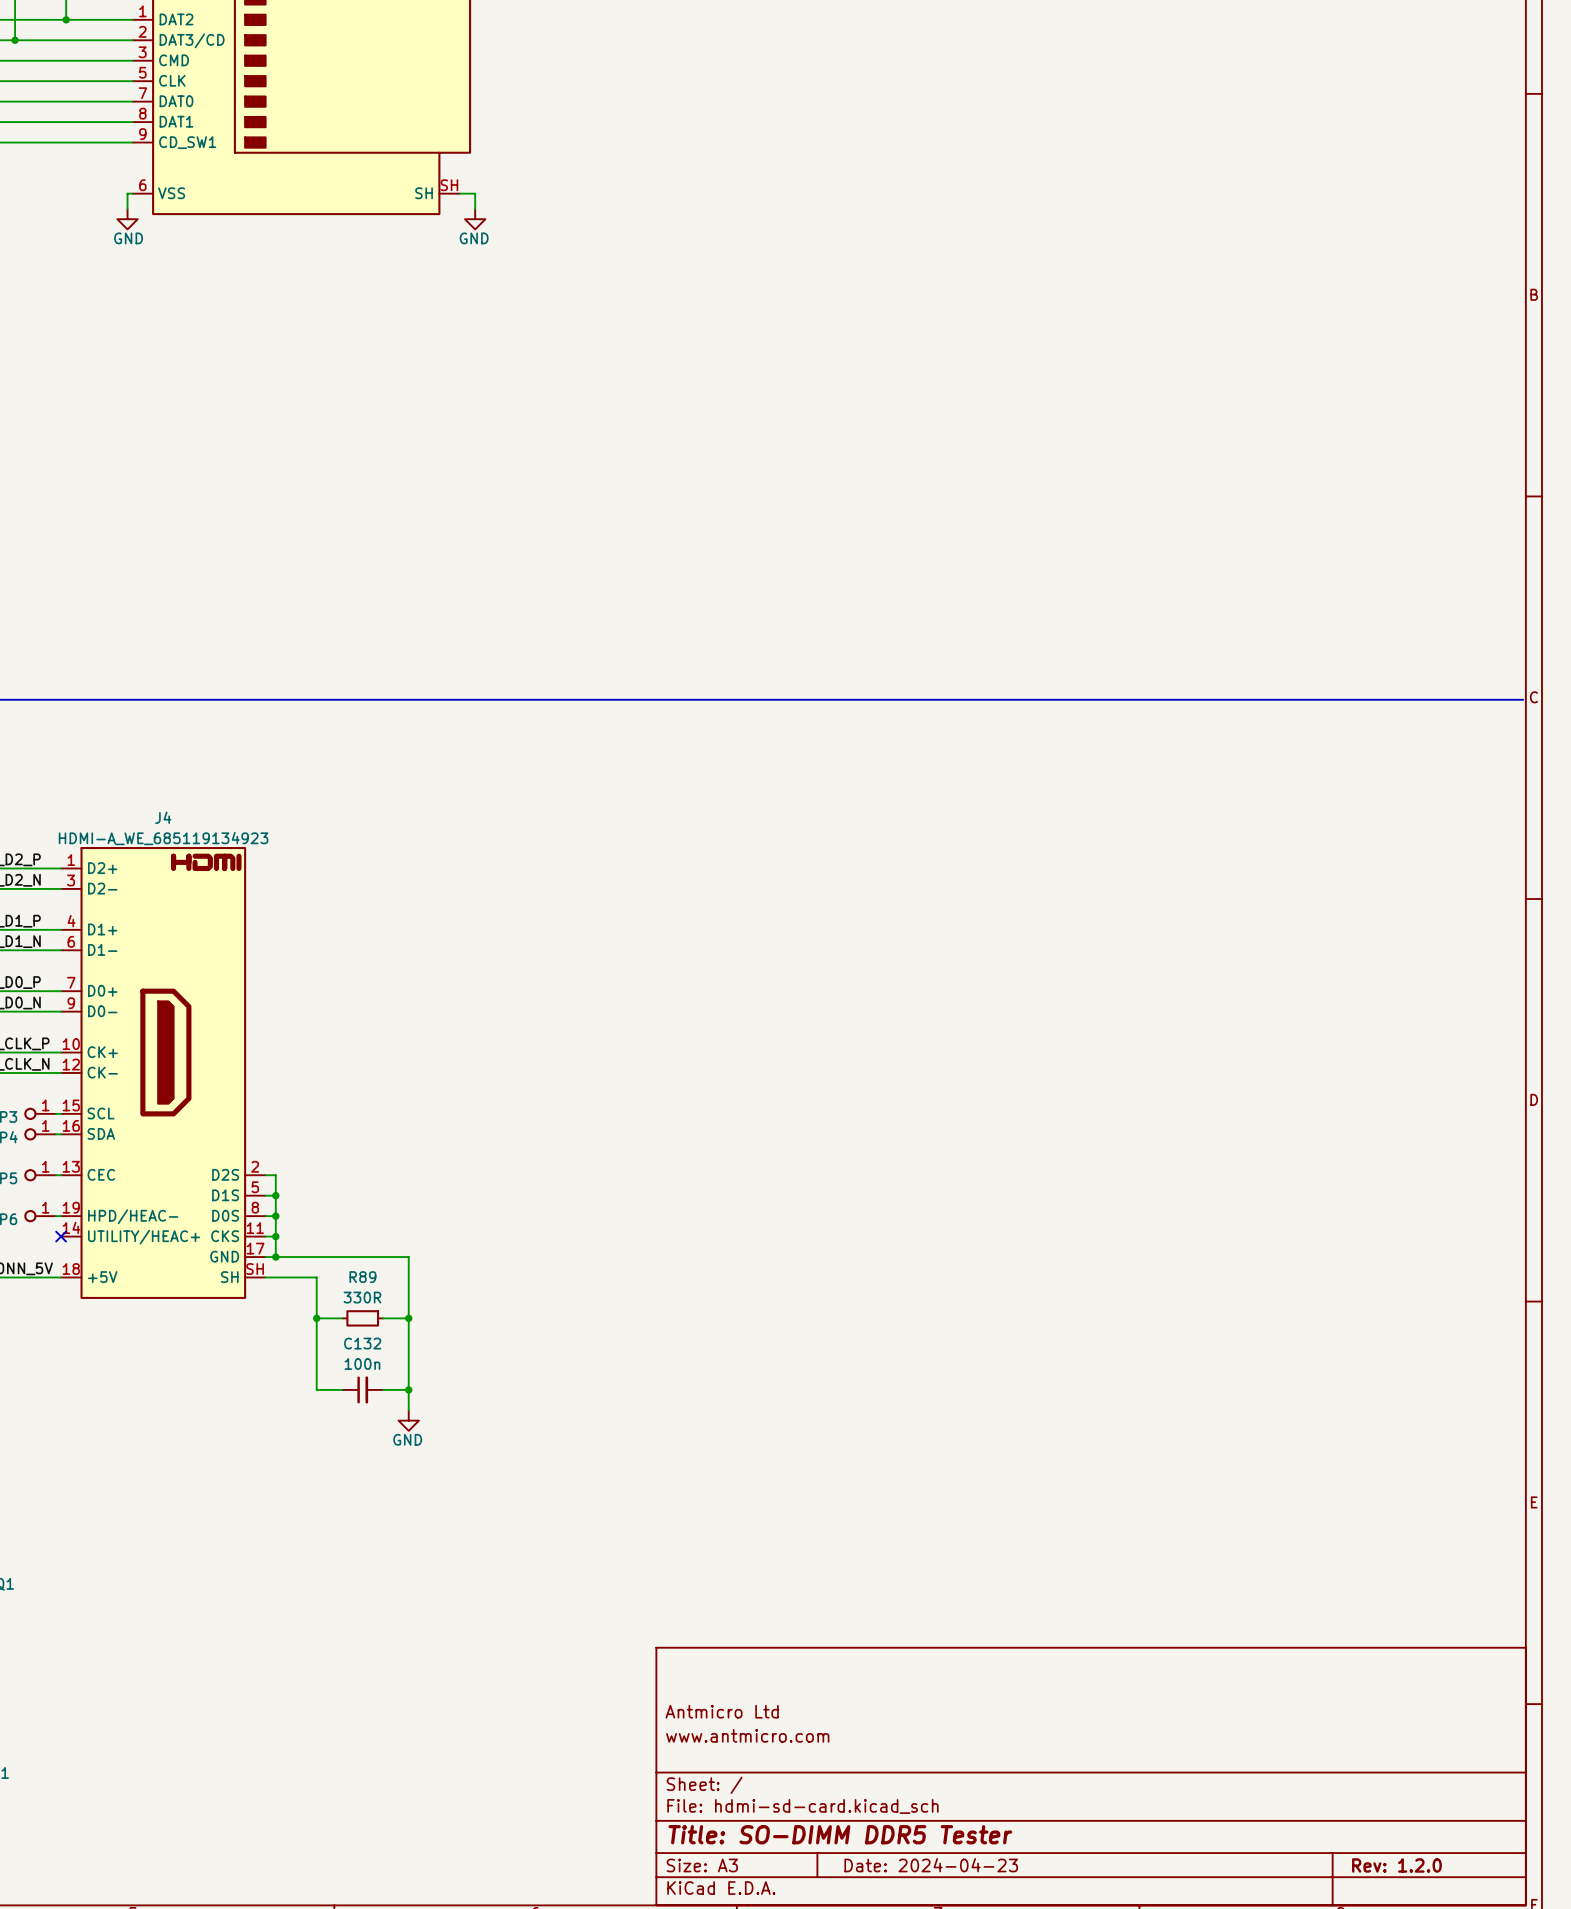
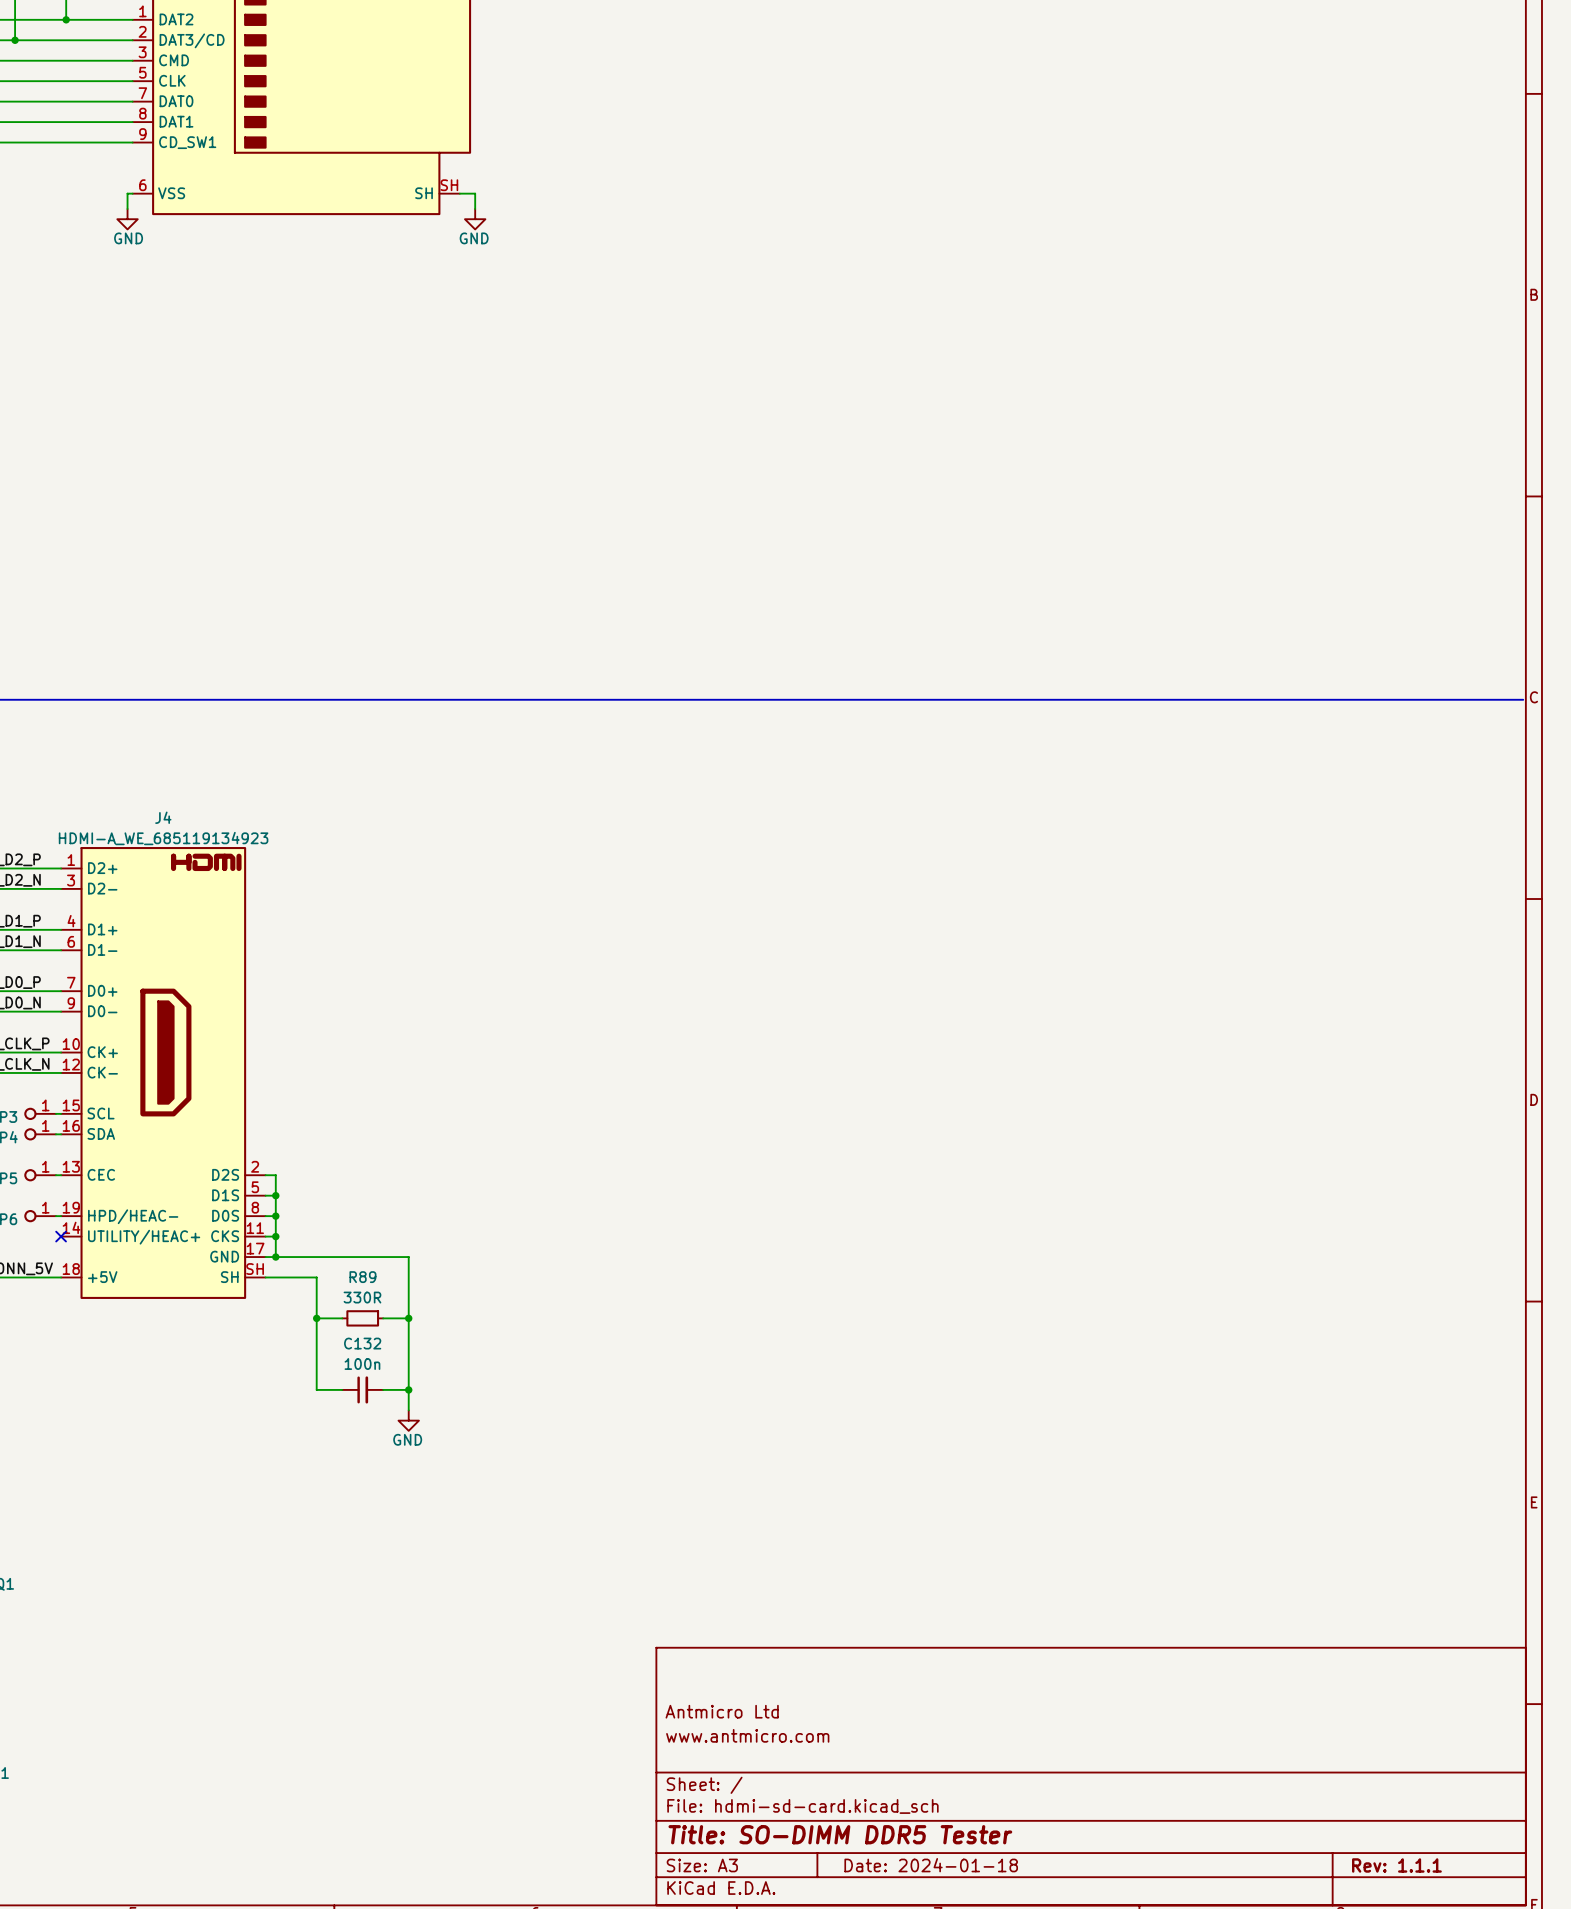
title block: Date: 2024-04-23 (931, 1865) -> Date: 2024-01-18 (931, 1865)
title block: Rev: 1.2.0 (1396, 1865) -> Rev: 1.1.1 (1396, 1865)

